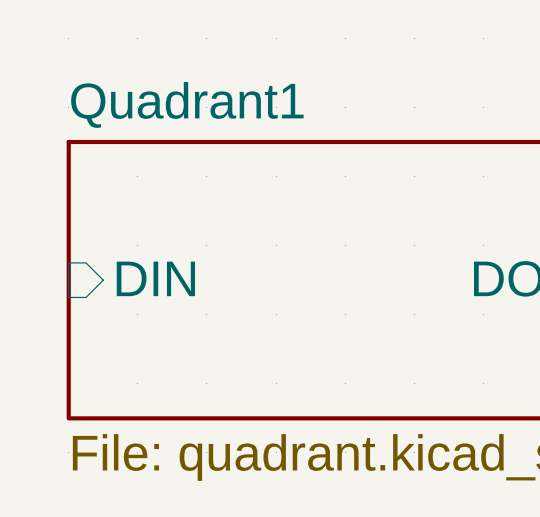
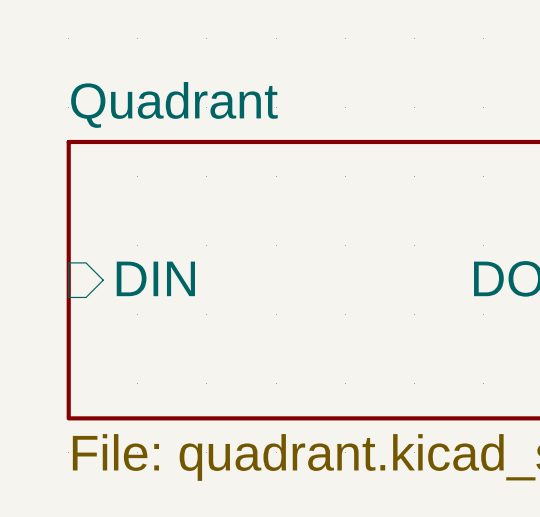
sheet Quadrant1 name: Quadrant1 (187, 104) -> Quadrant (174, 104)

